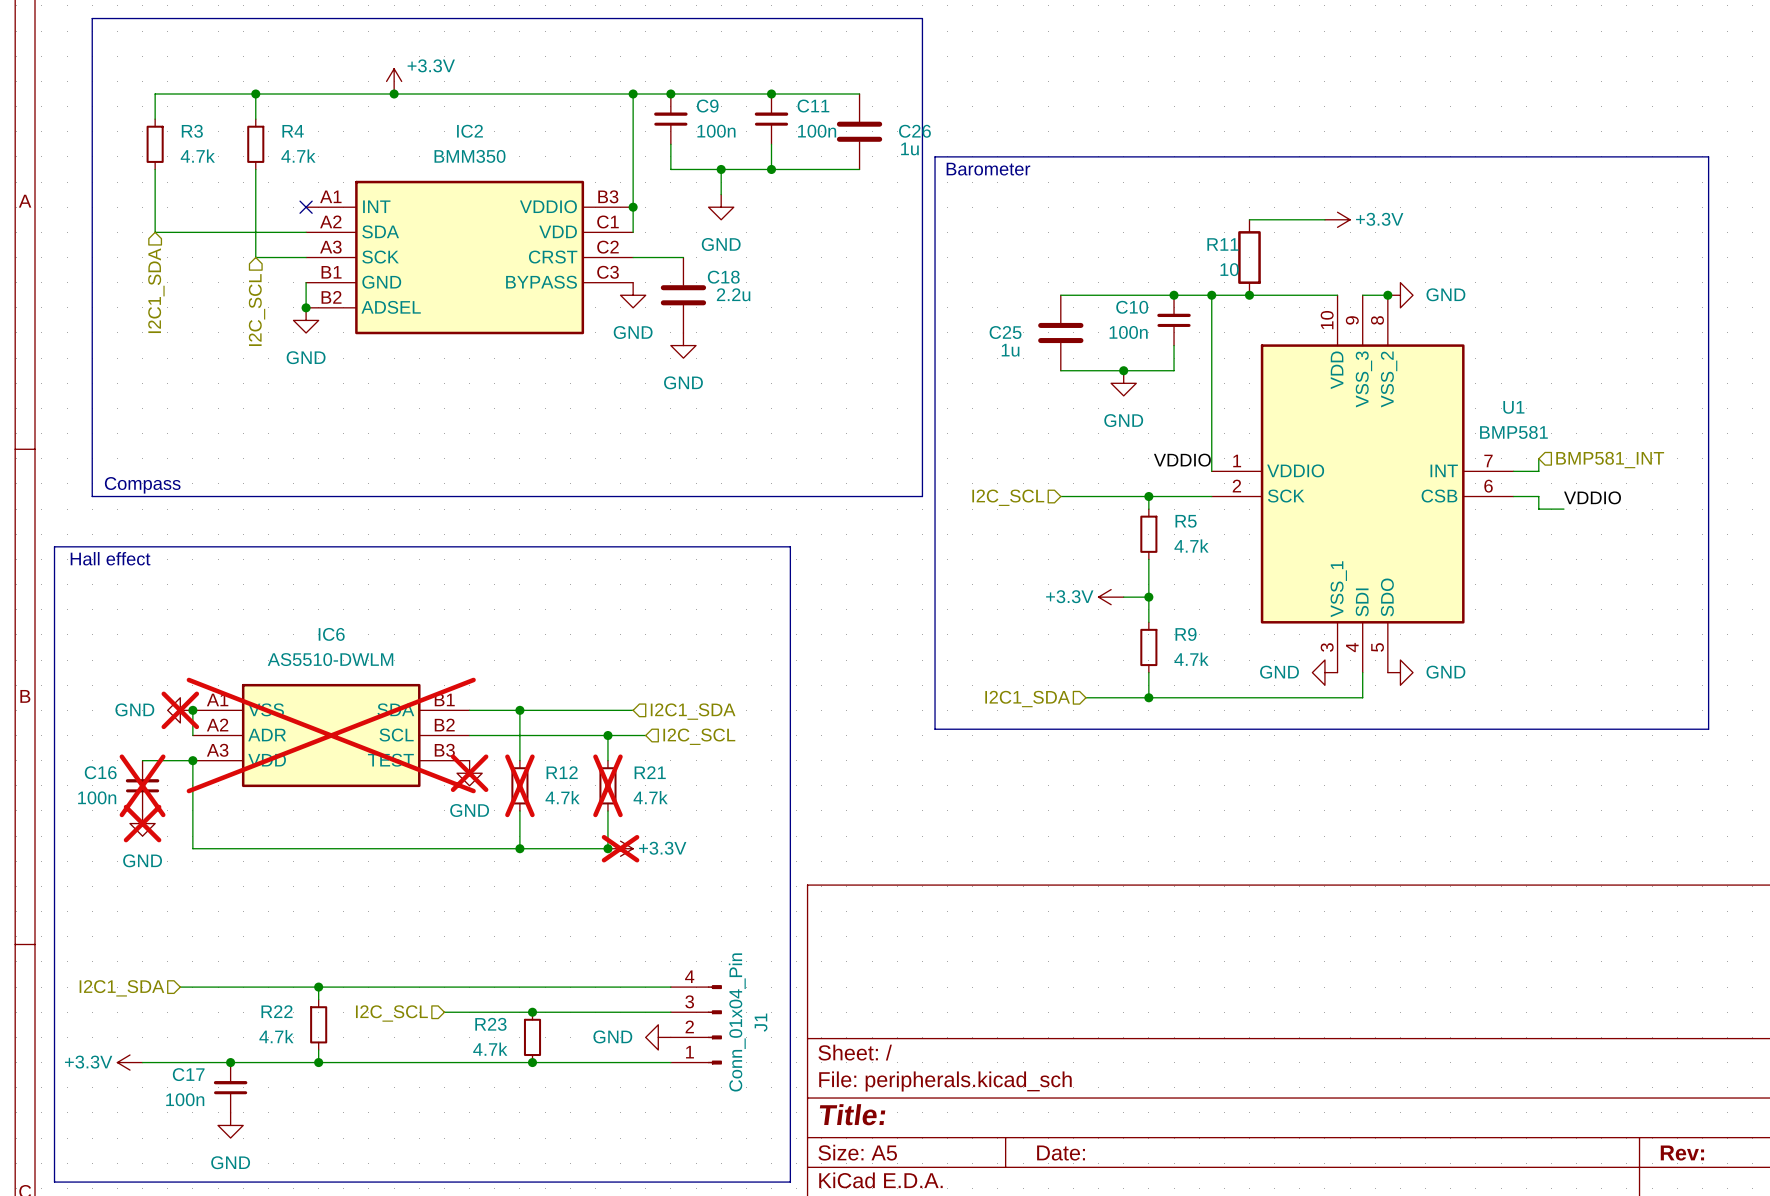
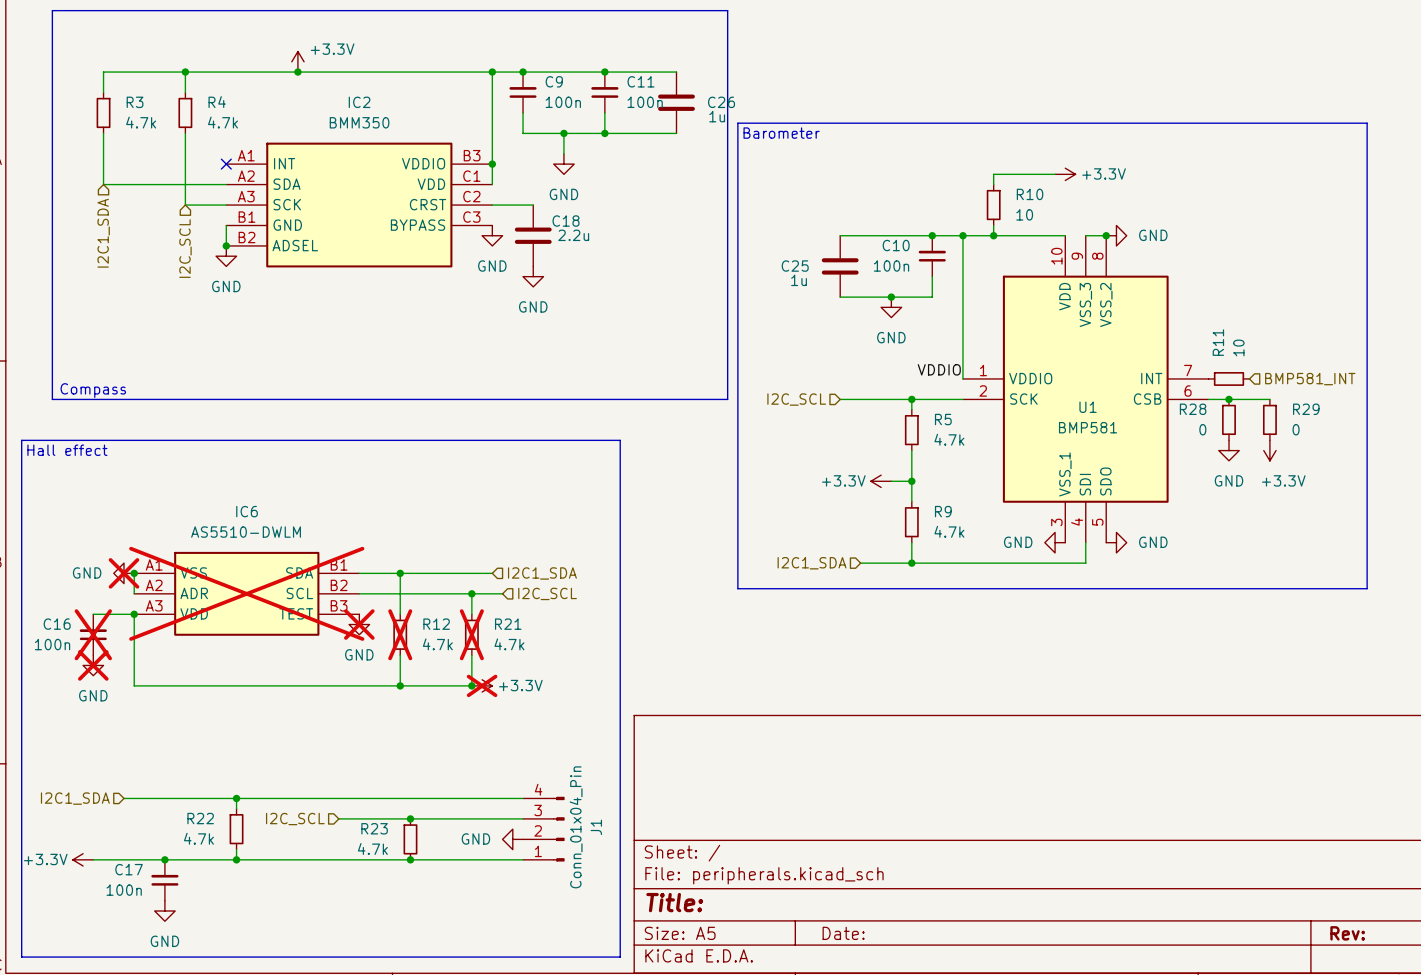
R11 symbol: [1238, 219, 1261, 296] -> [1208, 372, 1250, 386]
R11 name position: R11 (1222, 244) -> R11 (1218, 342)
R10: none -> 10 (993, 205)
R11 value position: 10 (1229, 269) -> 10 (1238, 347)
U1 name position: U1 (1513, 407) -> U1 (1088, 407)
U1 value position: BMP581 (1513, 432) -> BMP581 (1088, 427)
wire: (1538, 458) (1538, 471) (1513, 471) -> none
hierarchical label position: BMP581_INT (1610, 460) -> BMP581_INT (1310, 379)
wire: (1538, 496) (1538, 509) (1563, 509) -> (1229, 399) (1269, 399)
junction: none -> (1229, 399)
label: VDDIO (1592, 497) -> none
R28: none -> 0 (1229, 419)
R29: none -> 0 (1269, 419)
power symbol: none -> GND (1229, 450)
power symbol: none -> +3.3V (1269, 450)

